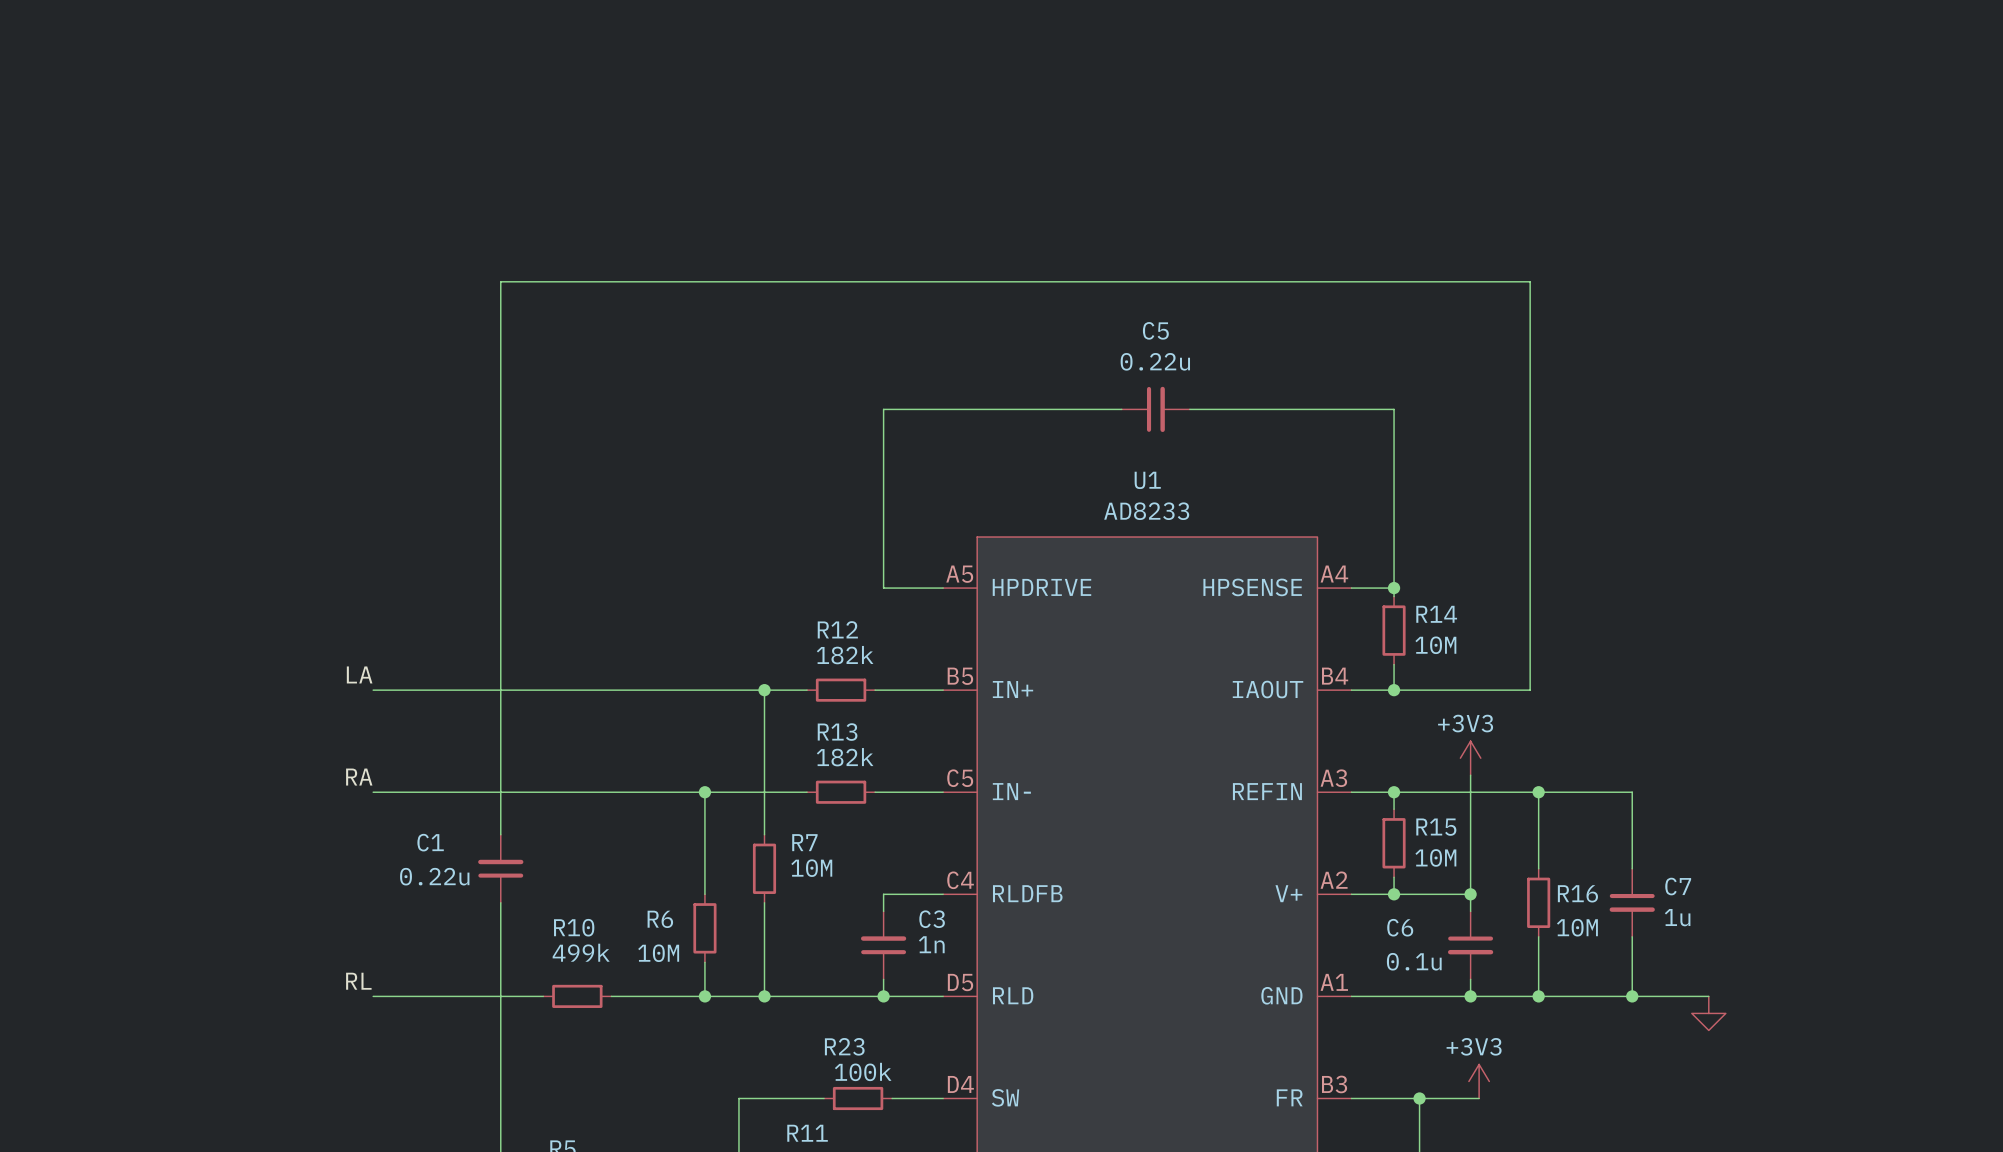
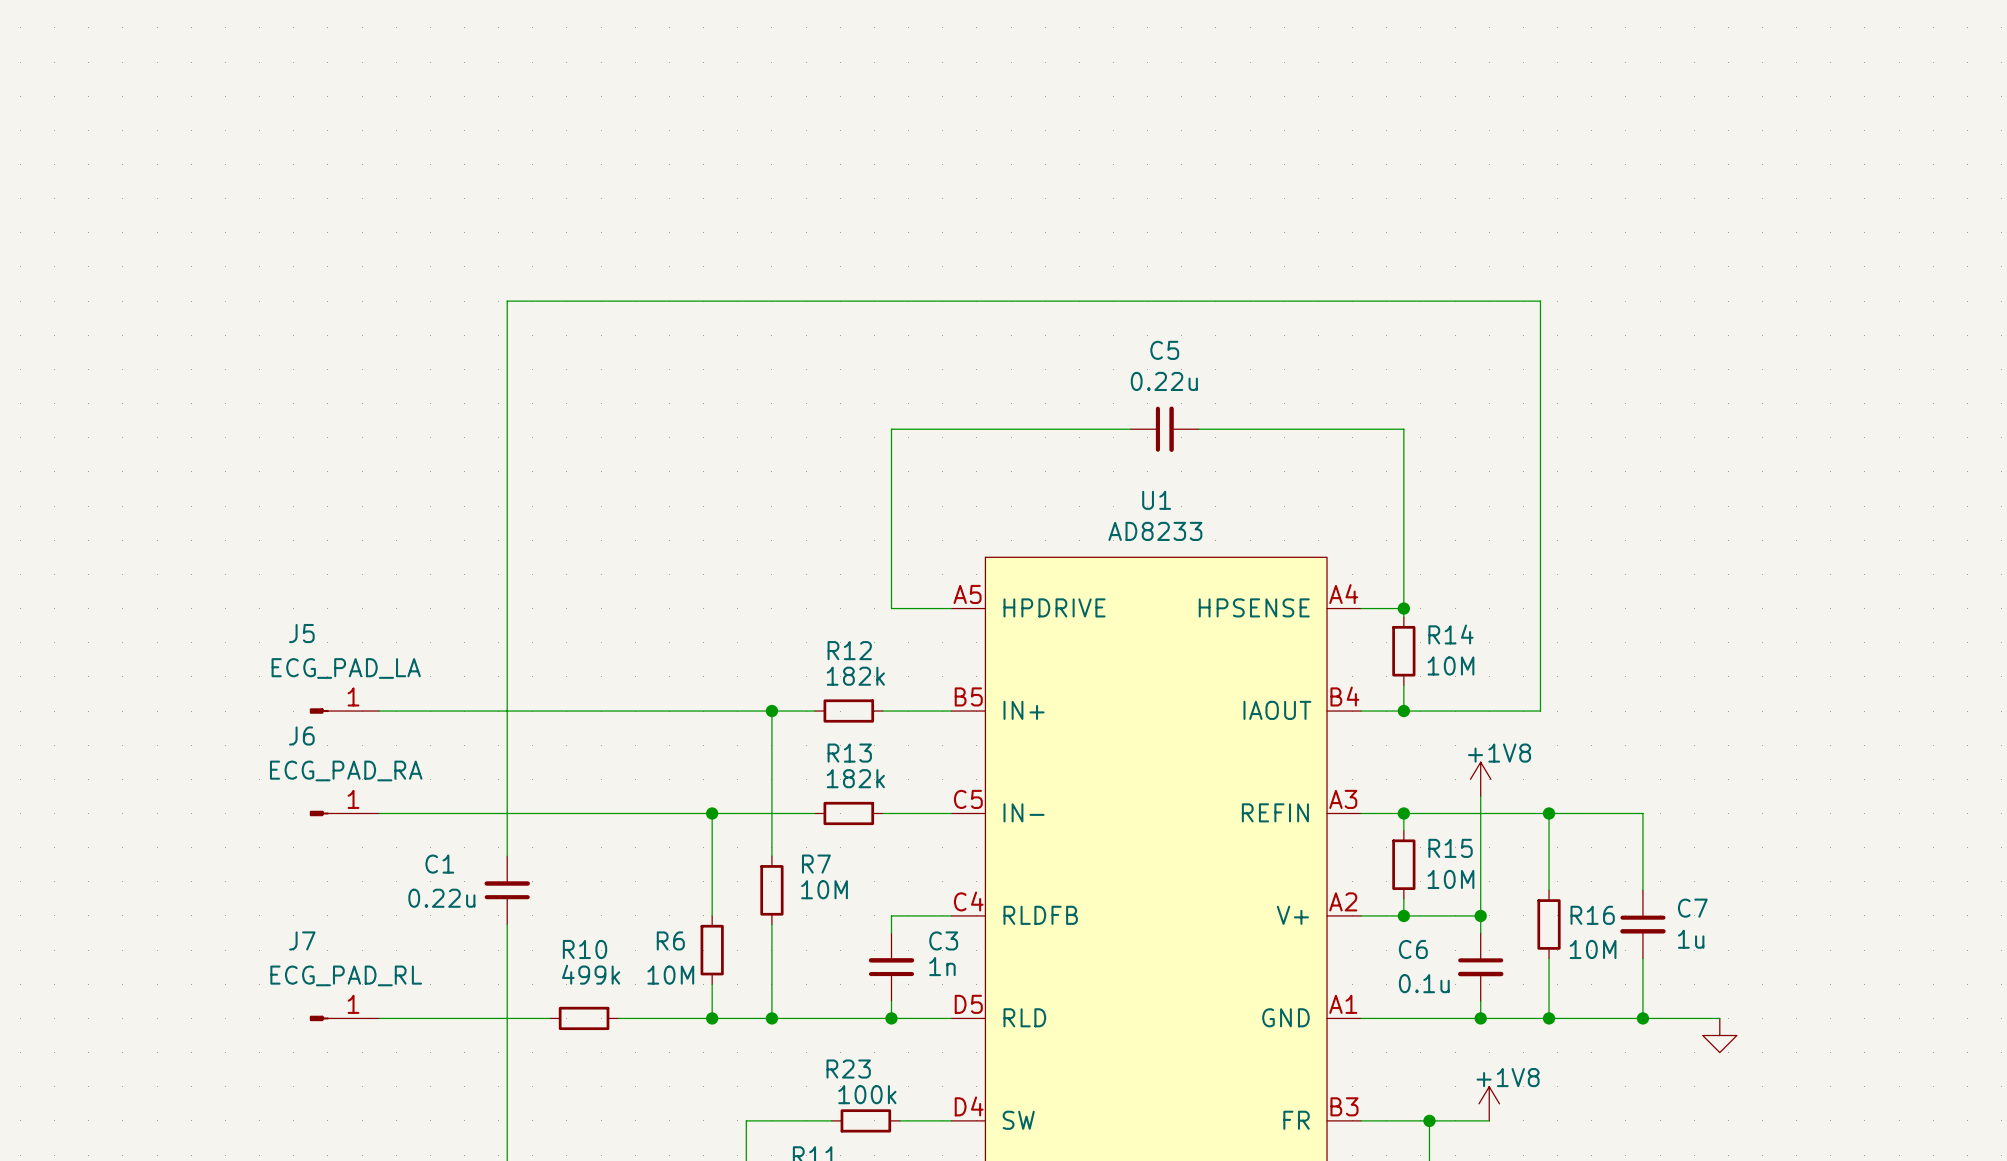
label: LA (359, 674) -> none
J5: none -> ECG_PAD_LA (344, 711)
power symbol: +3V3 (1470, 758) -> +1V8 (1480, 779)
label: RA (359, 777) -> none
J6: none -> ECG_PAD_RA (344, 813)
label: RL (358, 981) -> none
J7: none -> ECG_PAD_RL (344, 1018)
power symbol: +3V3 (1479, 1081) -> +1V8 (1489, 1103)

